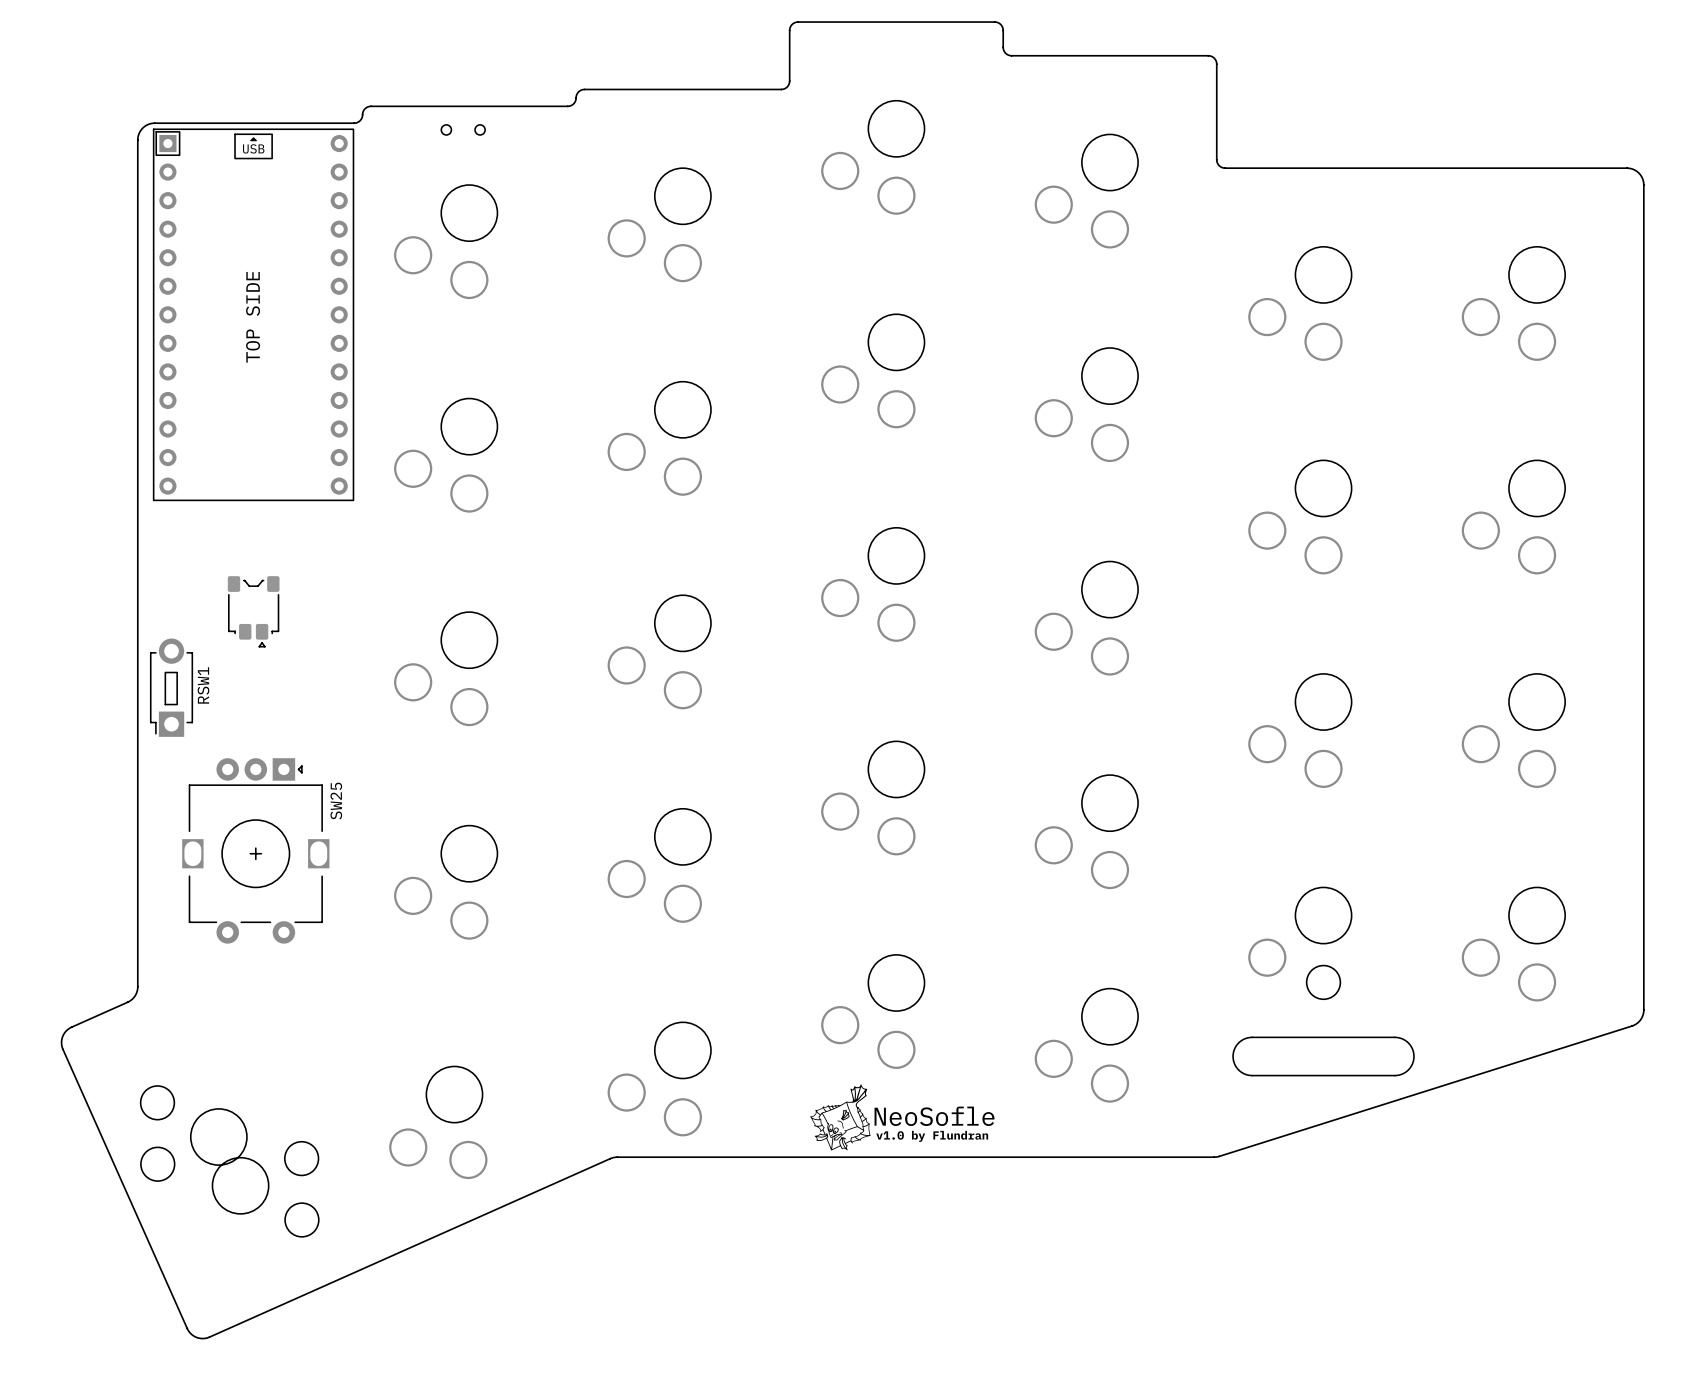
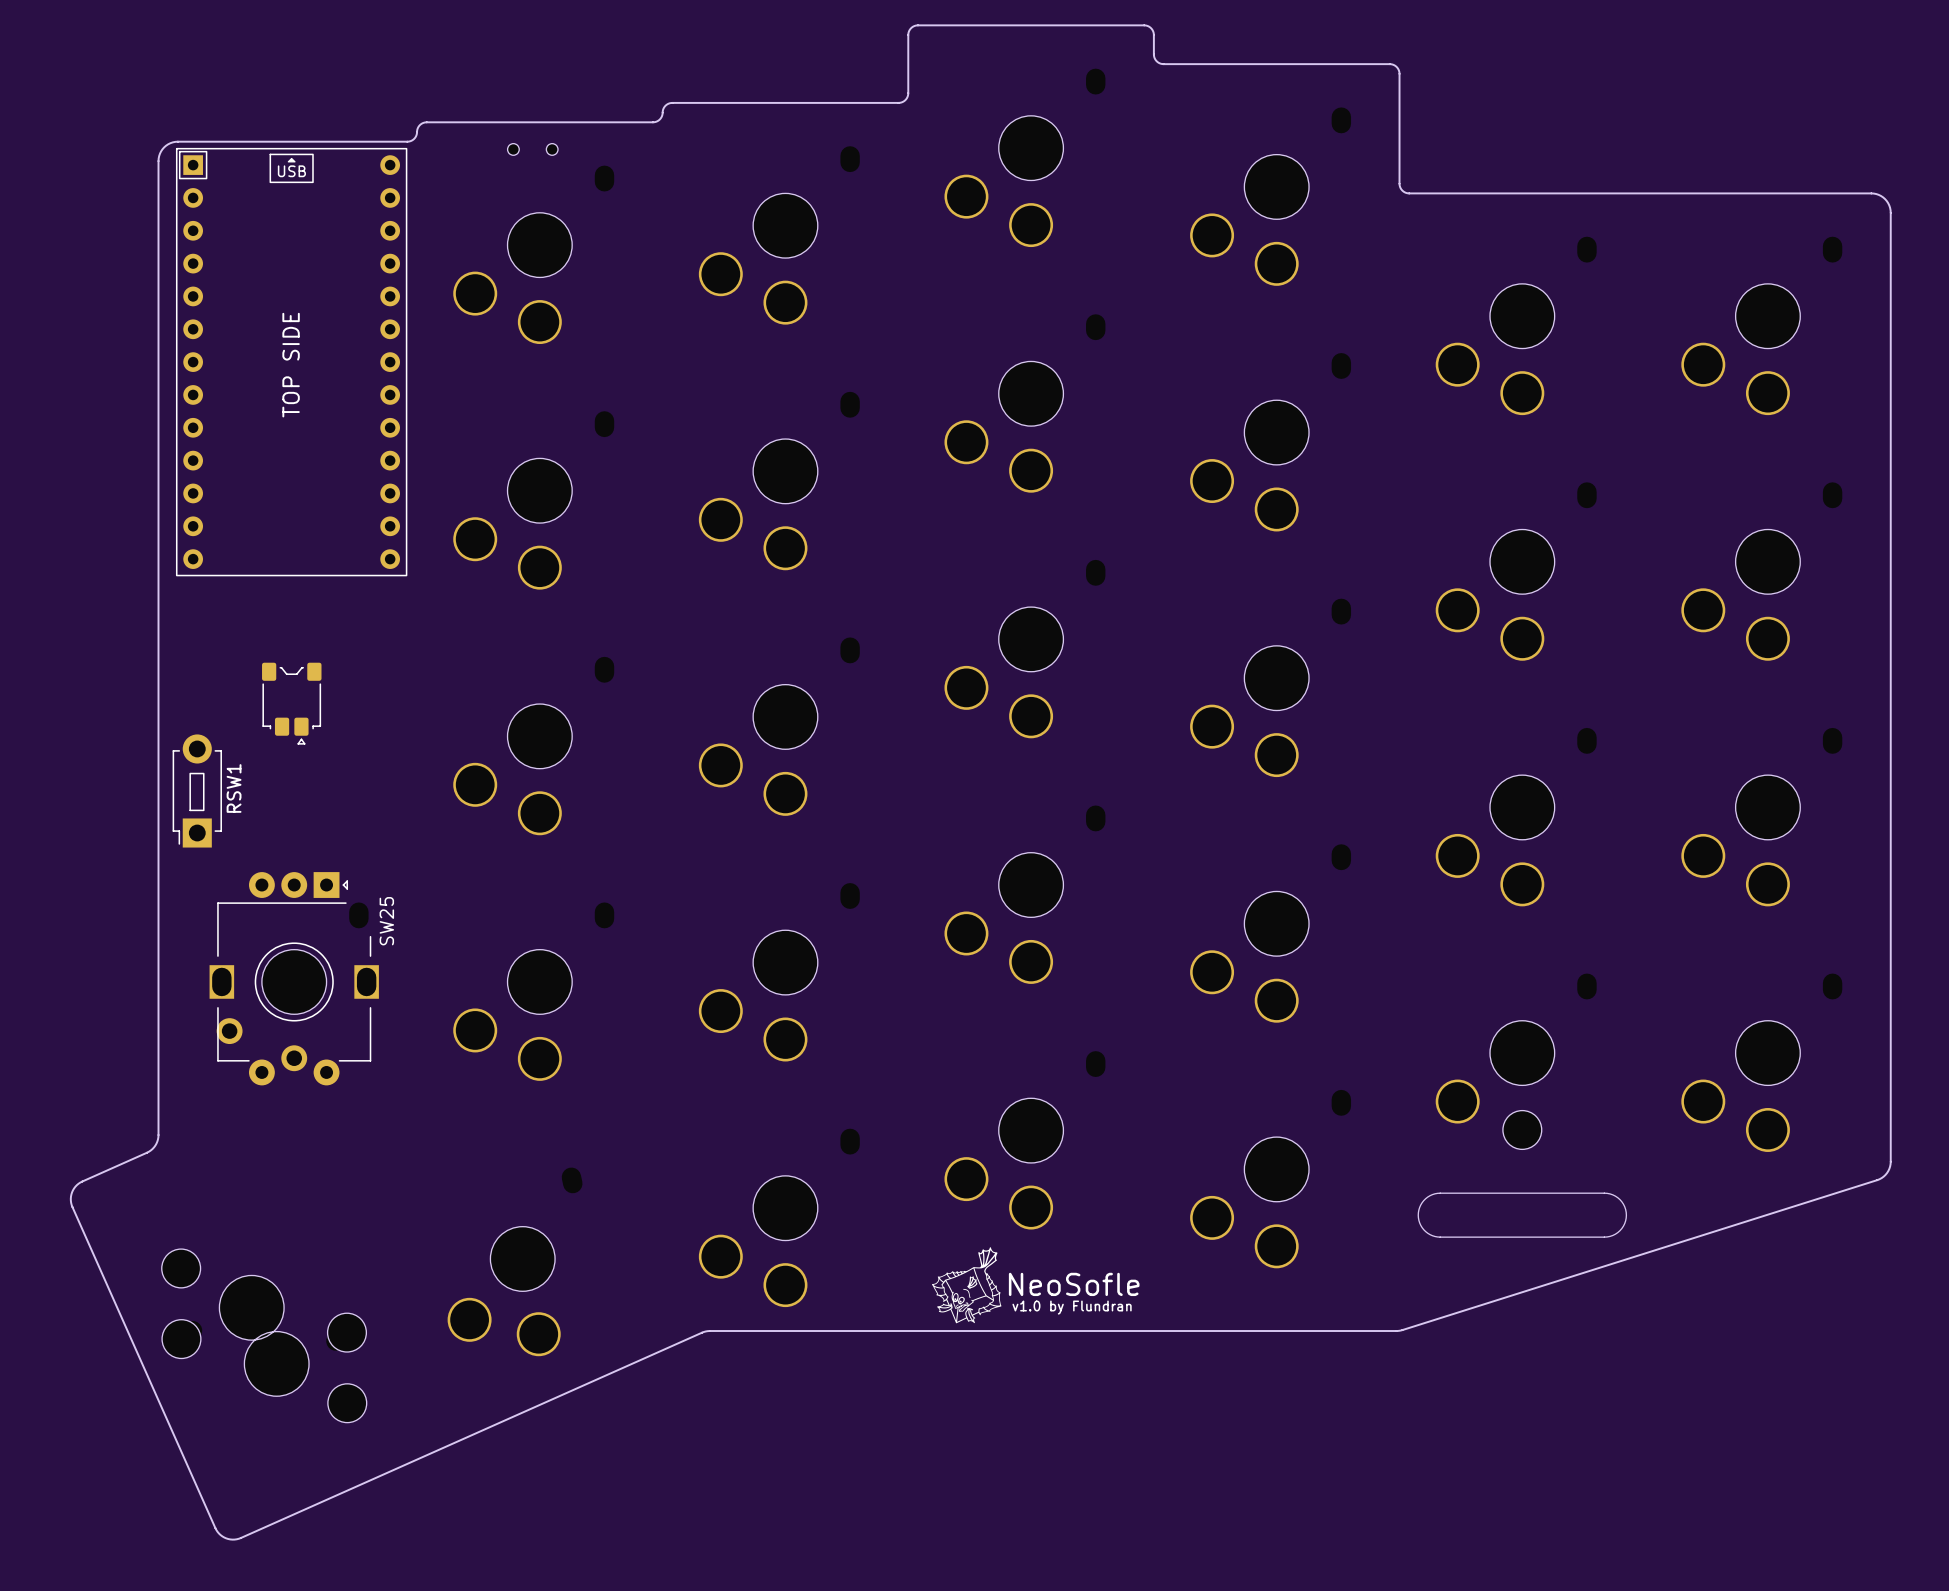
SW25 footprint: [182, 758, 330, 944] -> [209, 872, 379, 1086]

